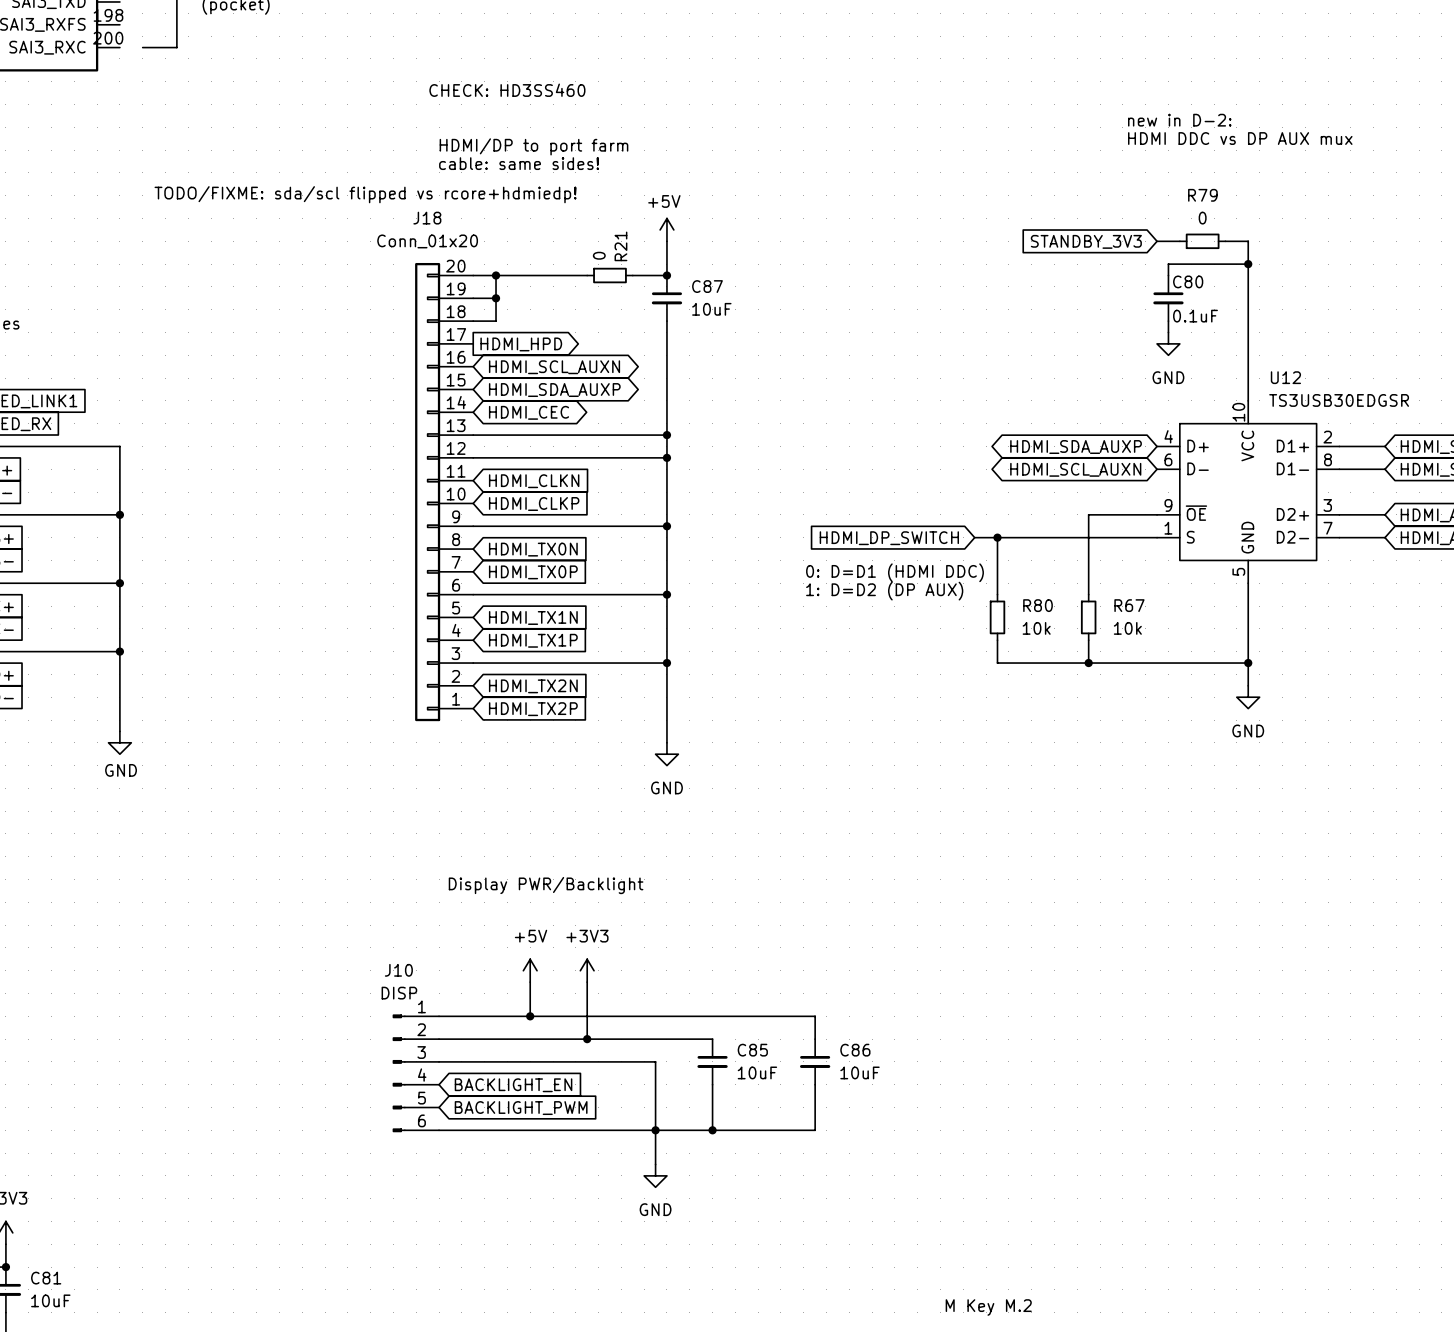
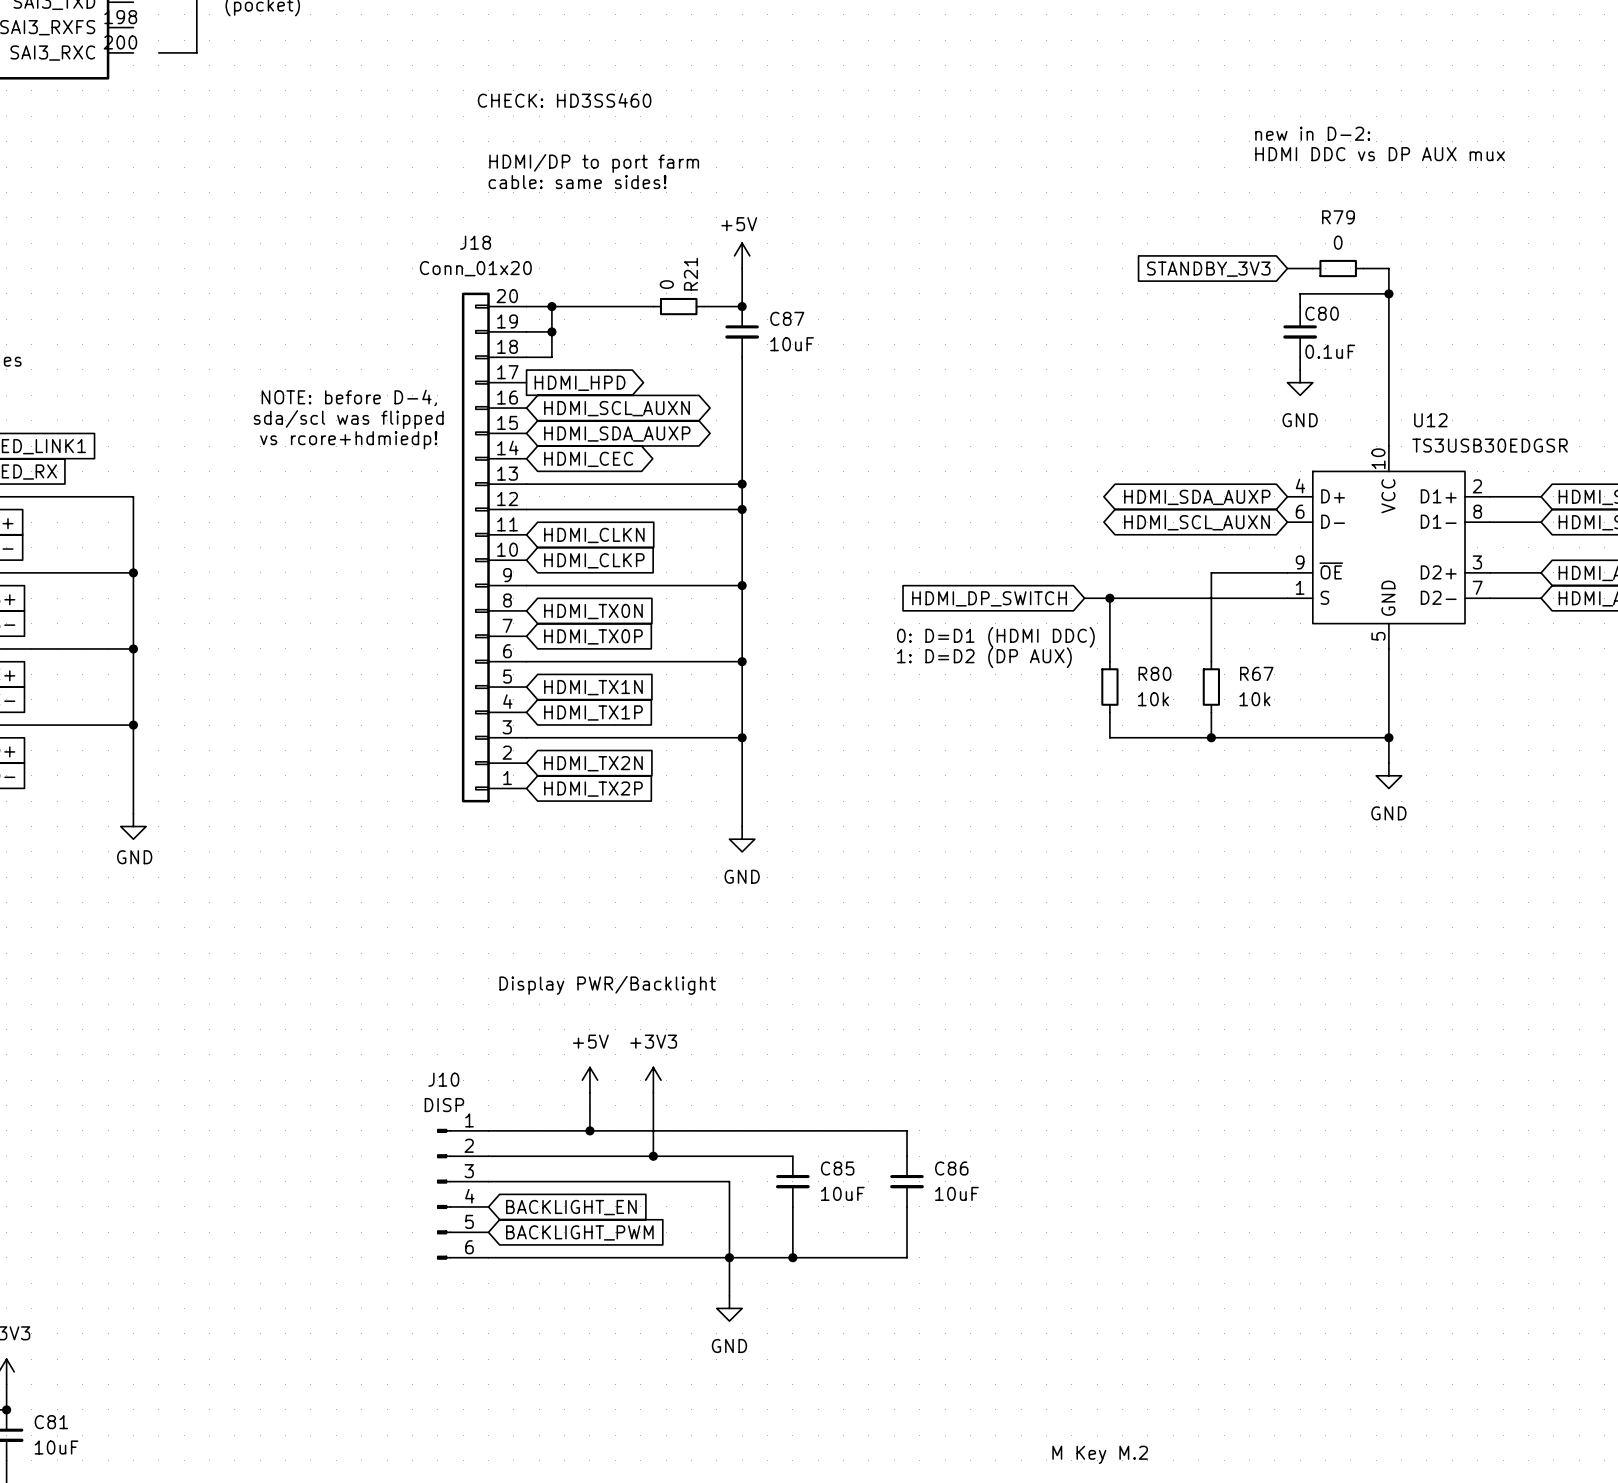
text: TODO/FIXME: sda/scl flipped vs rcore+hdmiedp! (365, 194) -> none
text: none -> NOTE: before D-4, (349, 397)
text: none -> sda/scl was flipped (348, 419)
text: none -> vs rcore+hdmiedp! (348, 440)

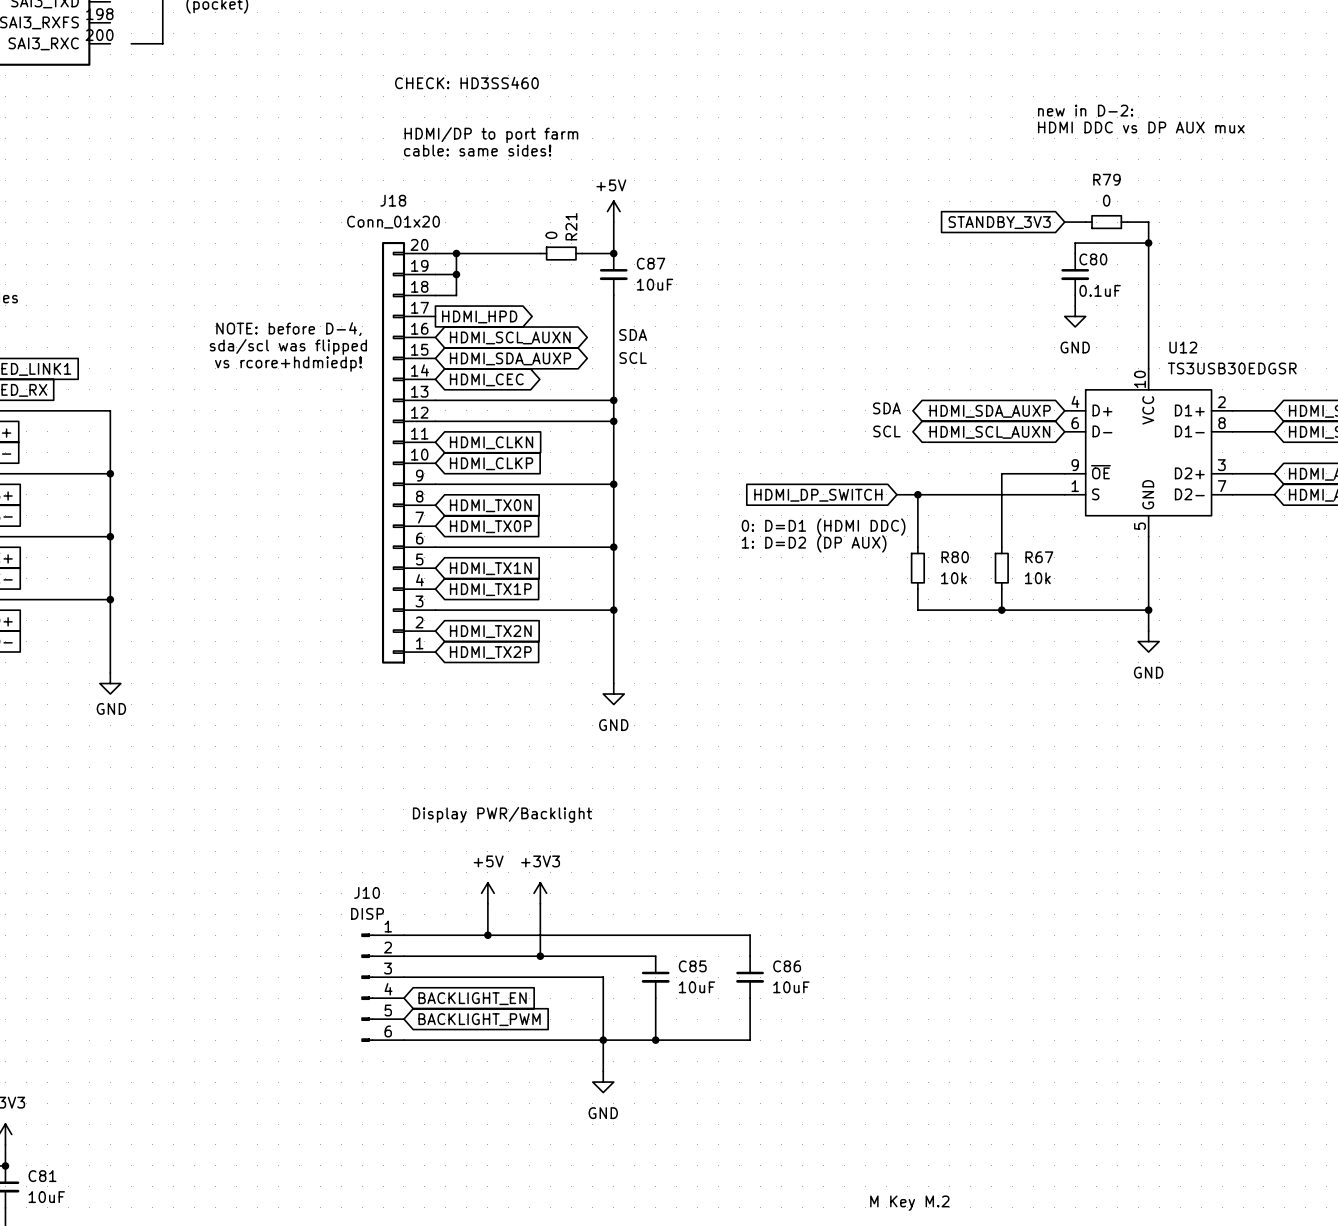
text: none -> SDA (633, 334)
text: none -> SCL (633, 358)
text: none -> SDA (886, 408)
text: none -> SCL (886, 431)

